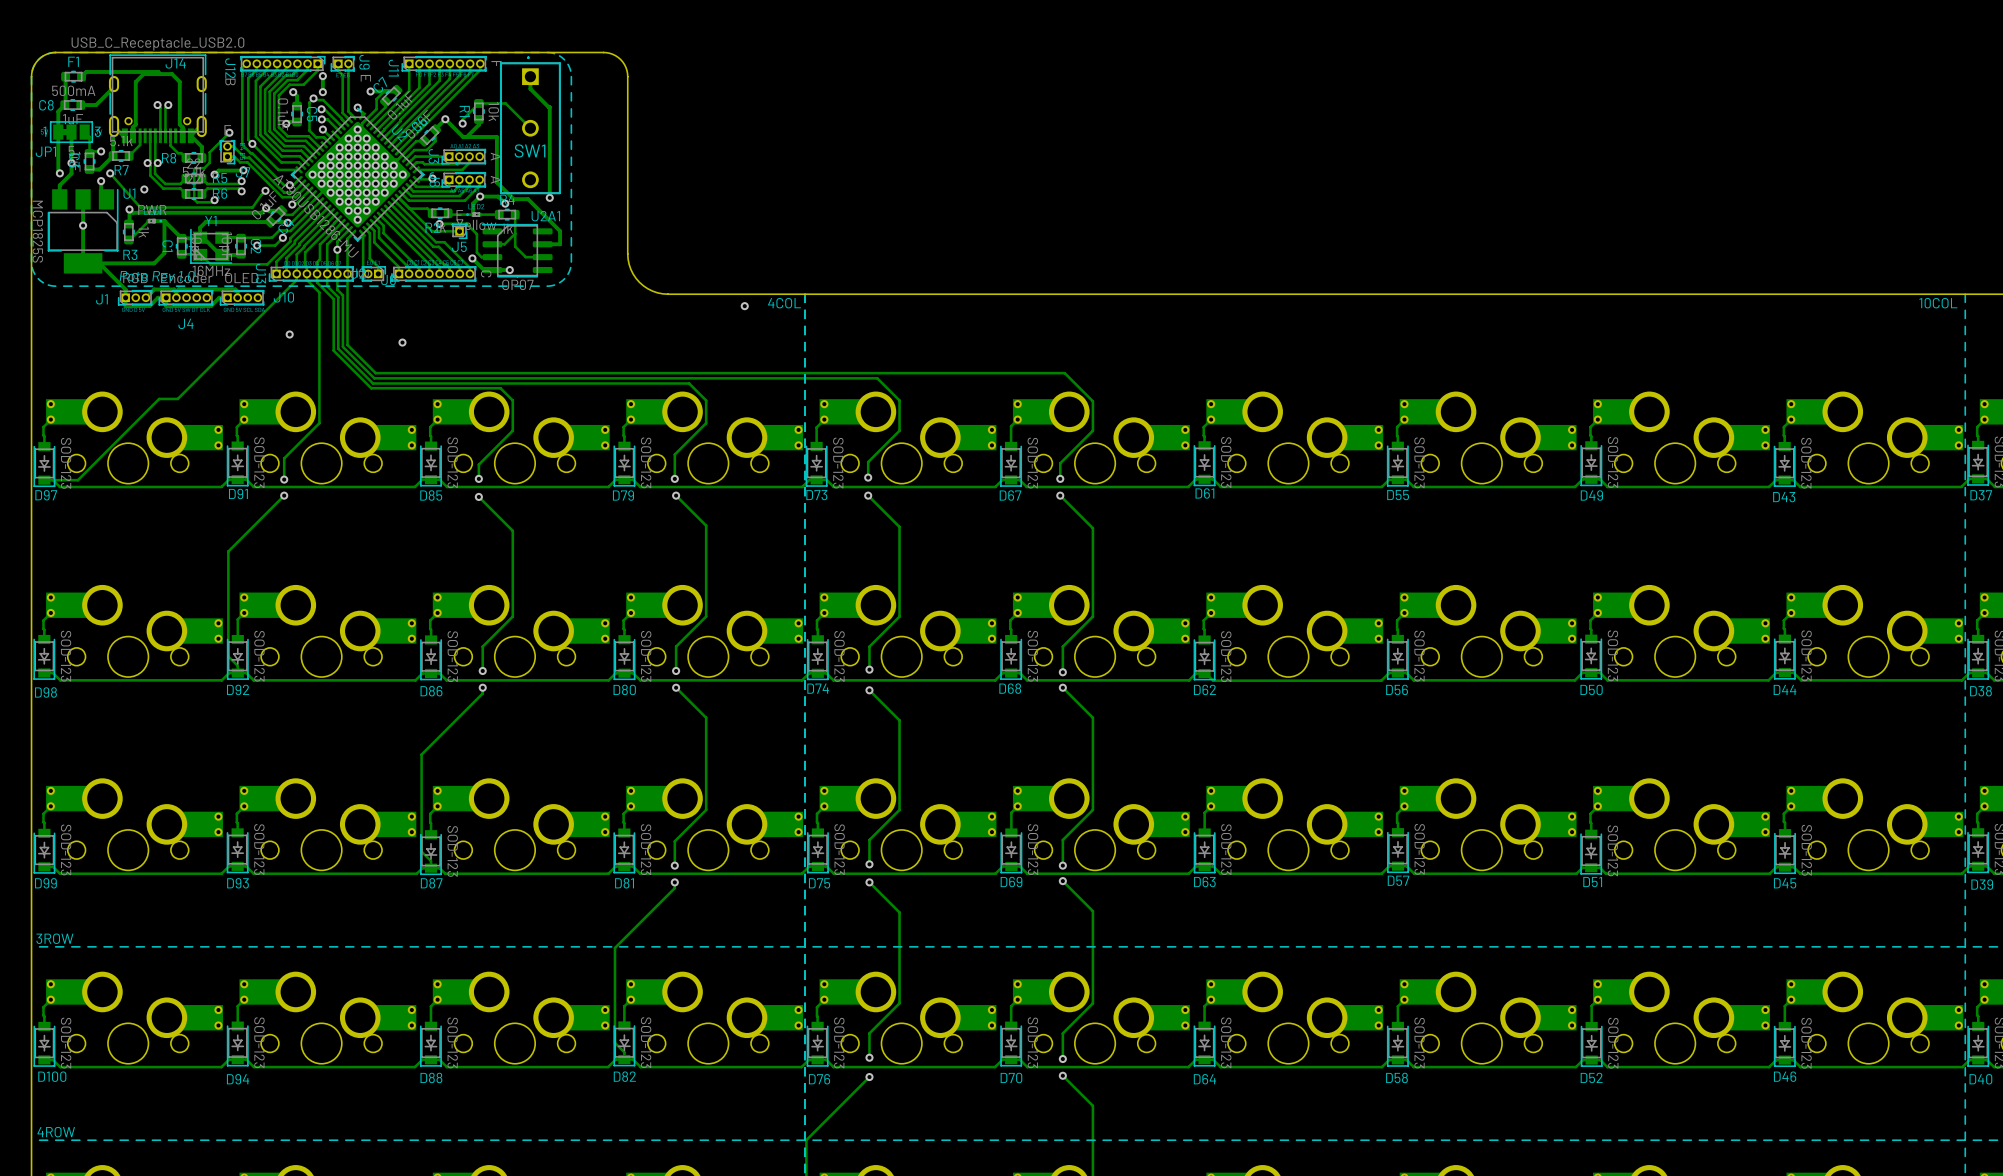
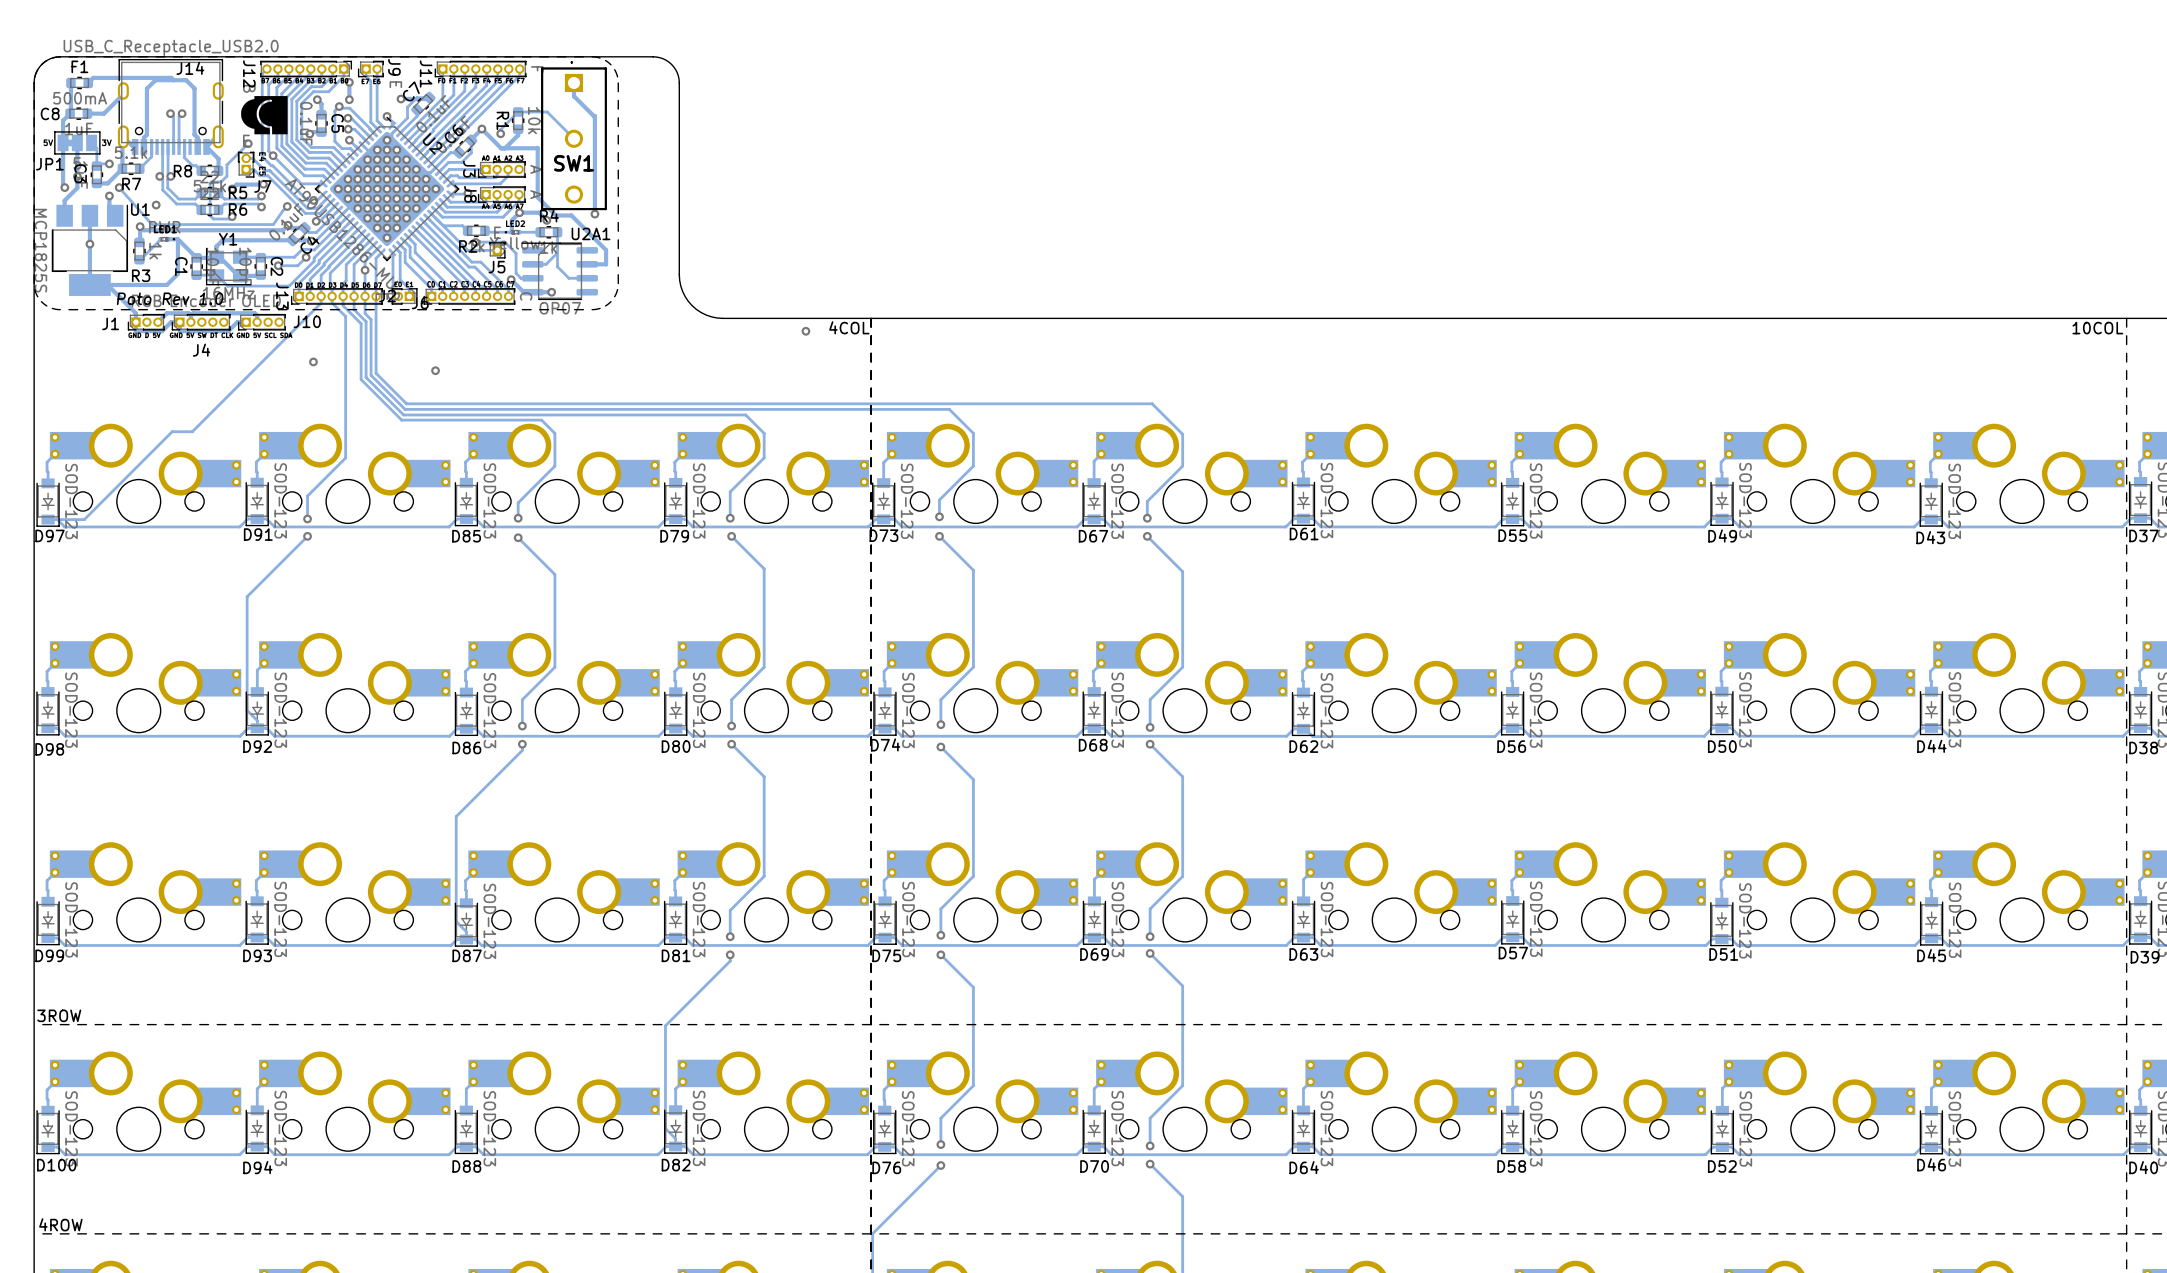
drawing: none -> [241, 96, 288, 135]
JP1 text: 1 (44, 131) -> none
JP1 text: 3 (97, 131) -> none

